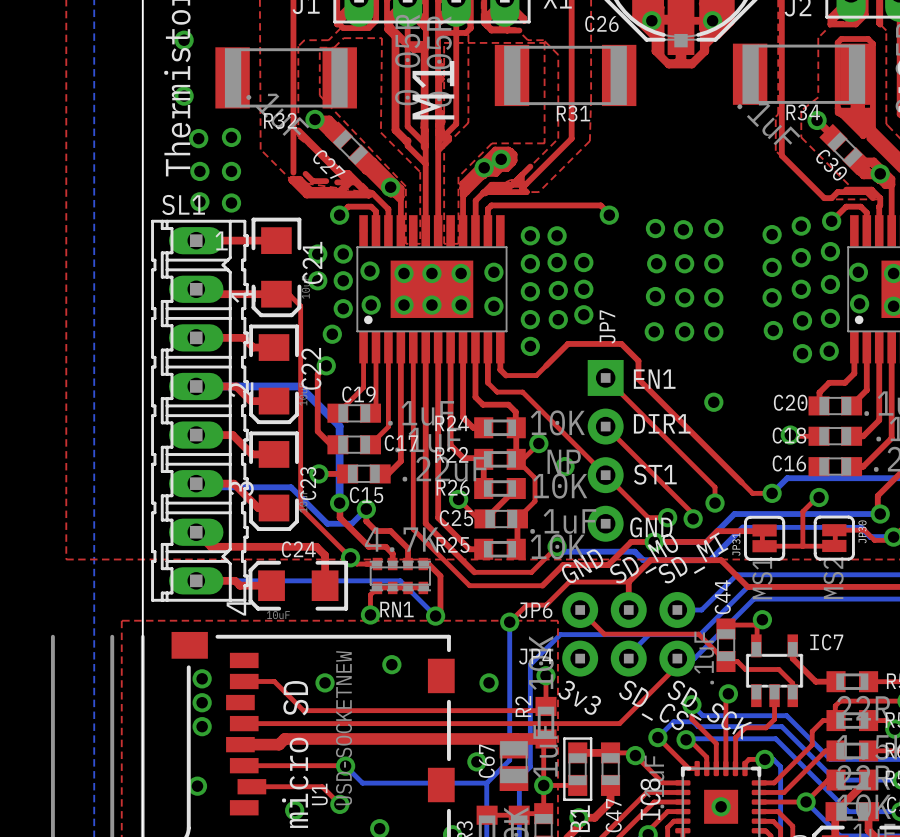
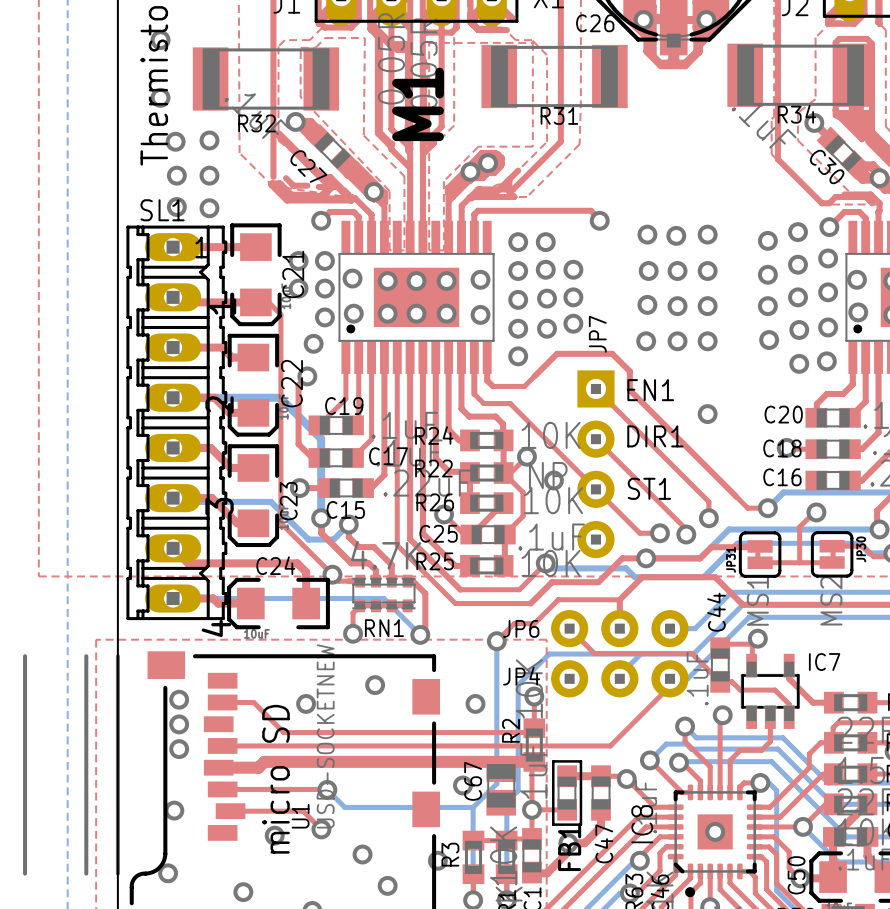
text: GND (651, 527) -> none
text: SD_MI (693, 557) -> none
text: SD_MO (643, 558) -> none
text: GND (582, 566) -> none
text: 3v3 (579, 697) -> none
text: SD_CS (653, 705) -> none
text: SD_SCK (710, 710) -> none

